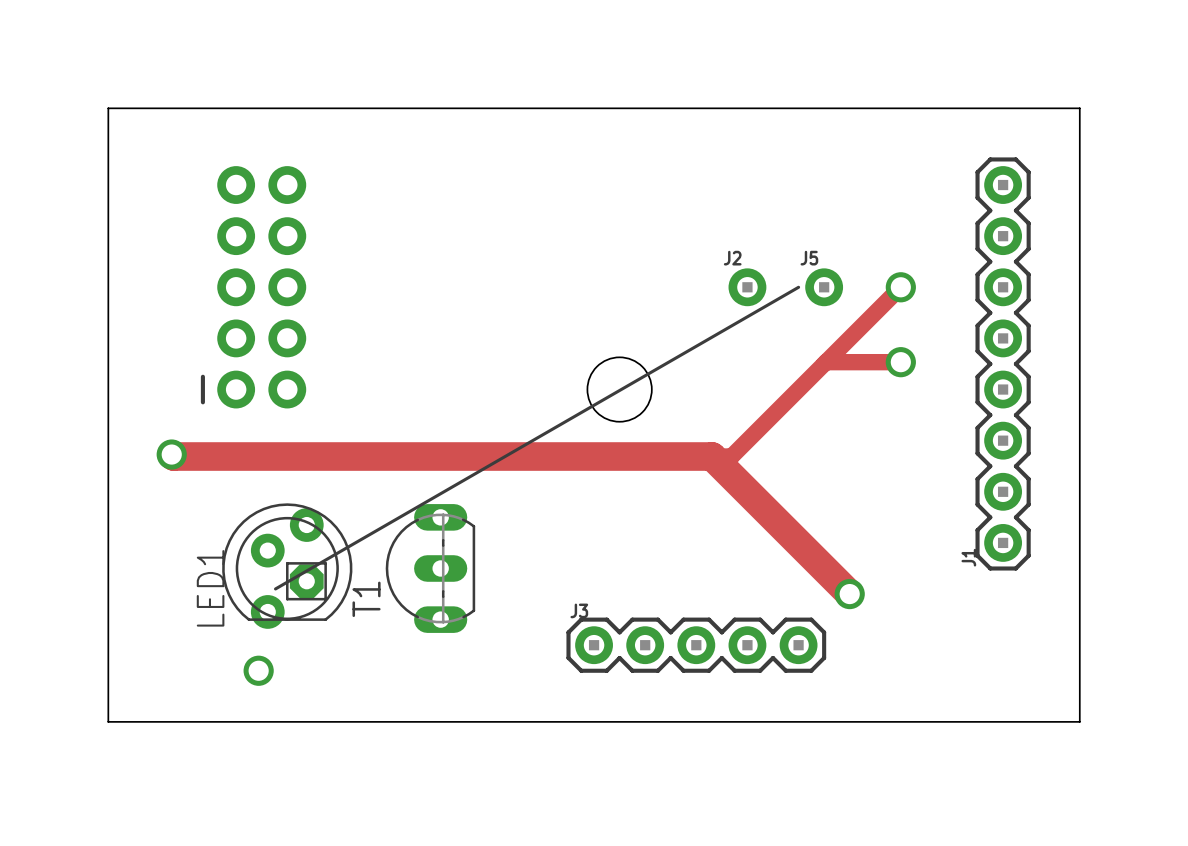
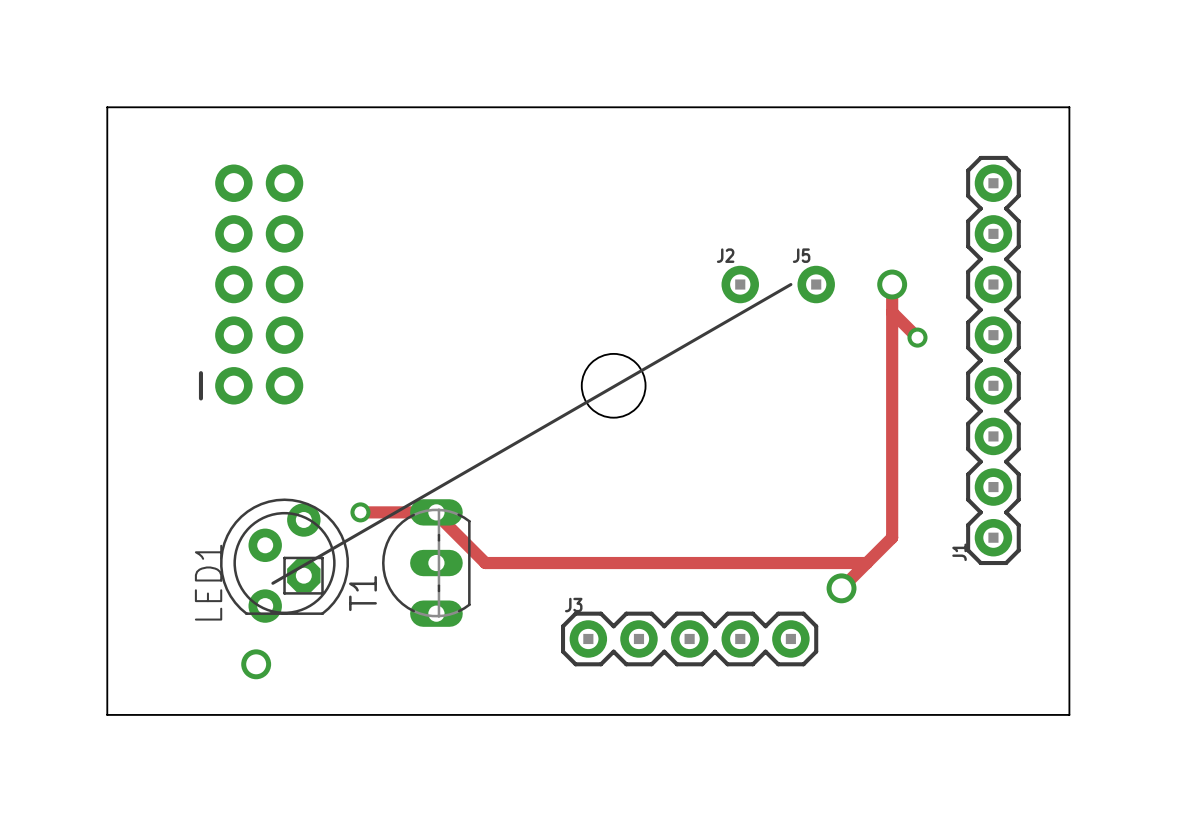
track: (900, 287) (731, 456) (712, 456) -> (892, 284) (892, 537) (841, 588)
track: none -> (892, 312) (917, 337)
via: none -> (917, 337)
track: (825, 362) (900, 362) -> none
via: (900, 362) -> none
track: (171, 454) (173, 456) (712, 456) -> none
via: (171, 454) -> none
track: (712, 456) (849, 594) -> none
track: none -> (360, 512) (434, 512) (485, 563) (866, 563)
via: none -> (360, 512)

